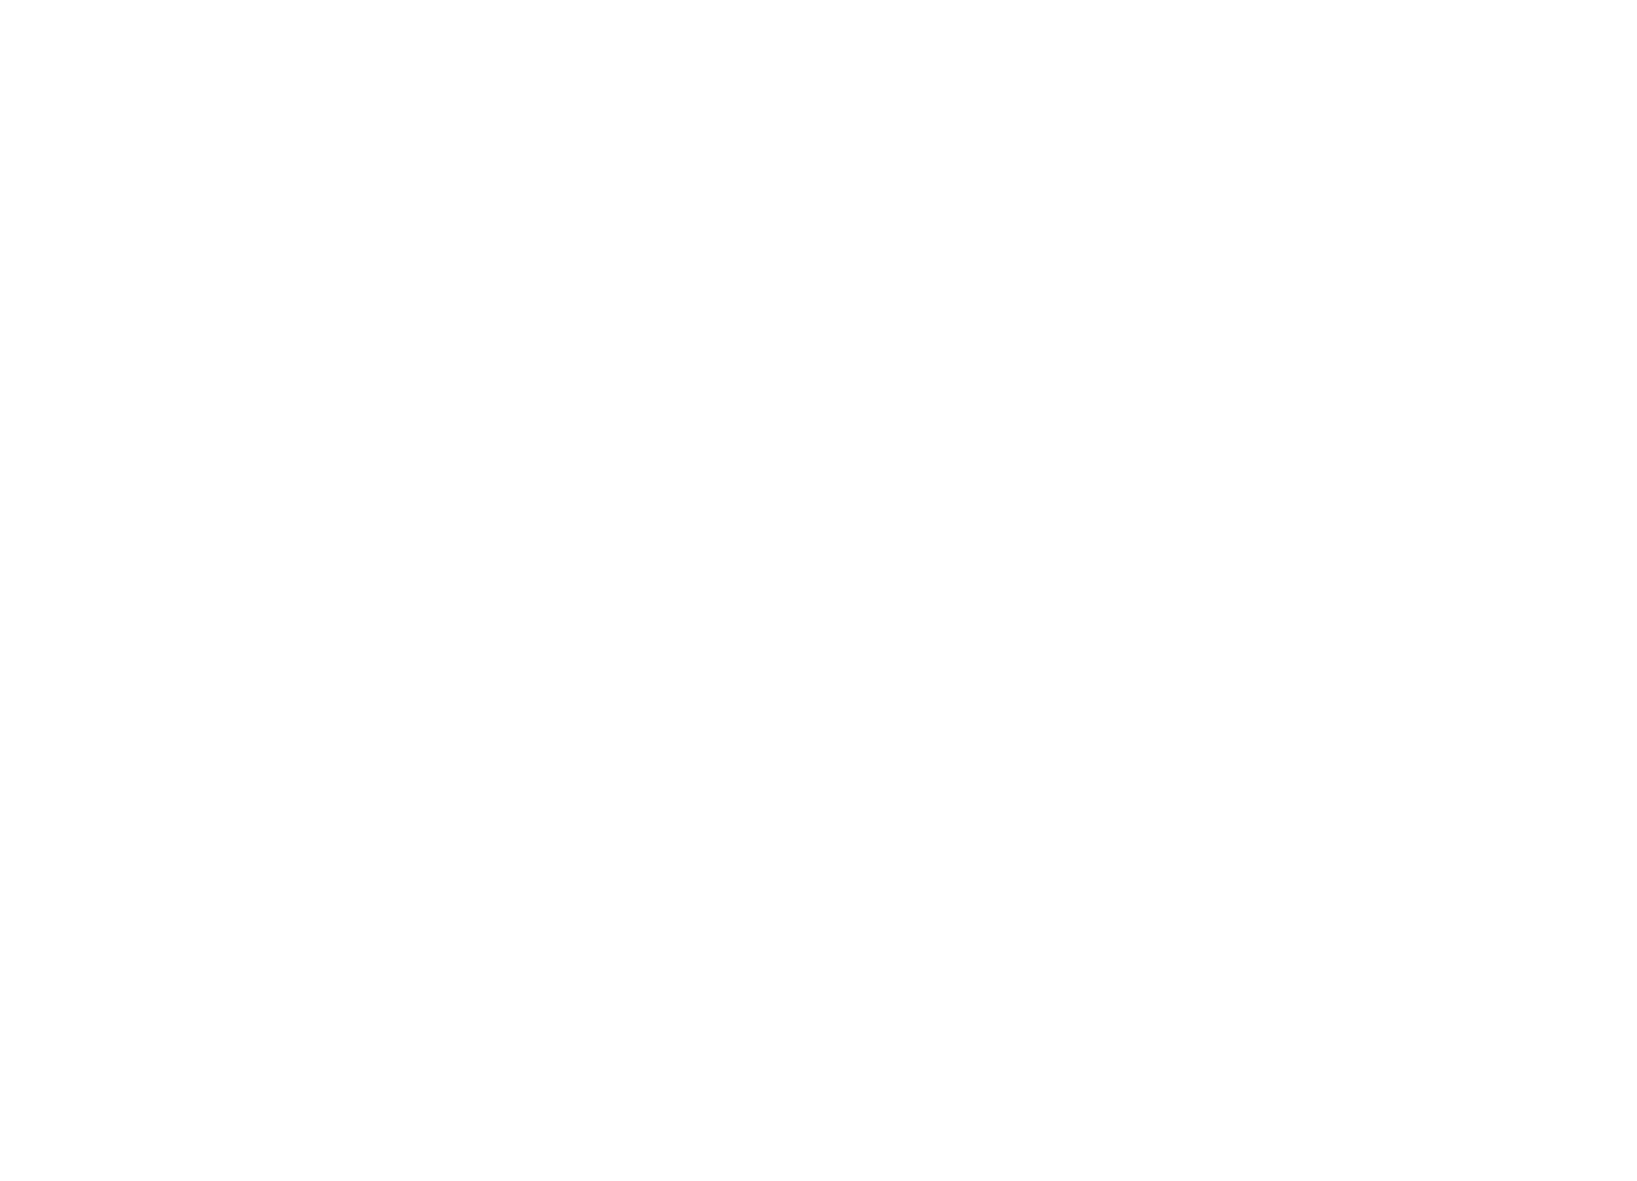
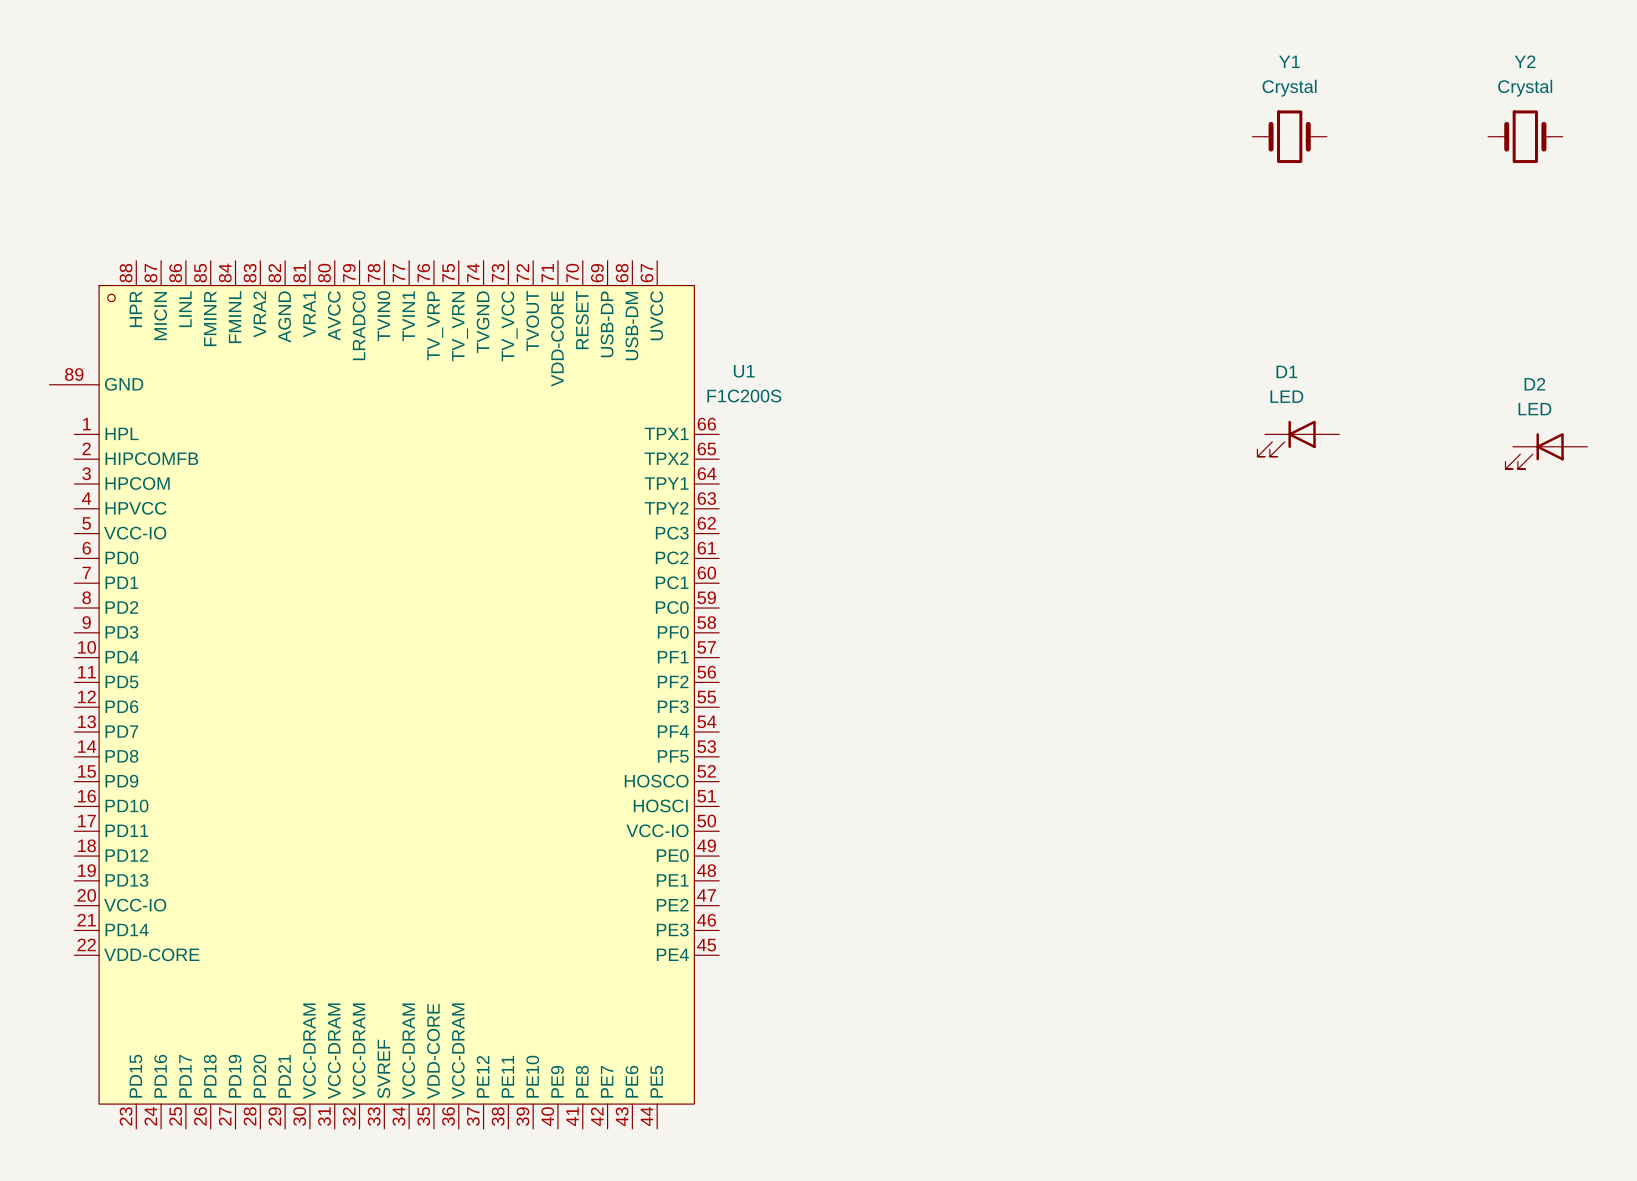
Y1: none -> Crystal (1289, 136)
Y2: none -> Crystal (1525, 136)
D1: none -> LED (1298, 438)
D2: none -> LED (1546, 451)
U1: none -> F1C200S (384, 694)

